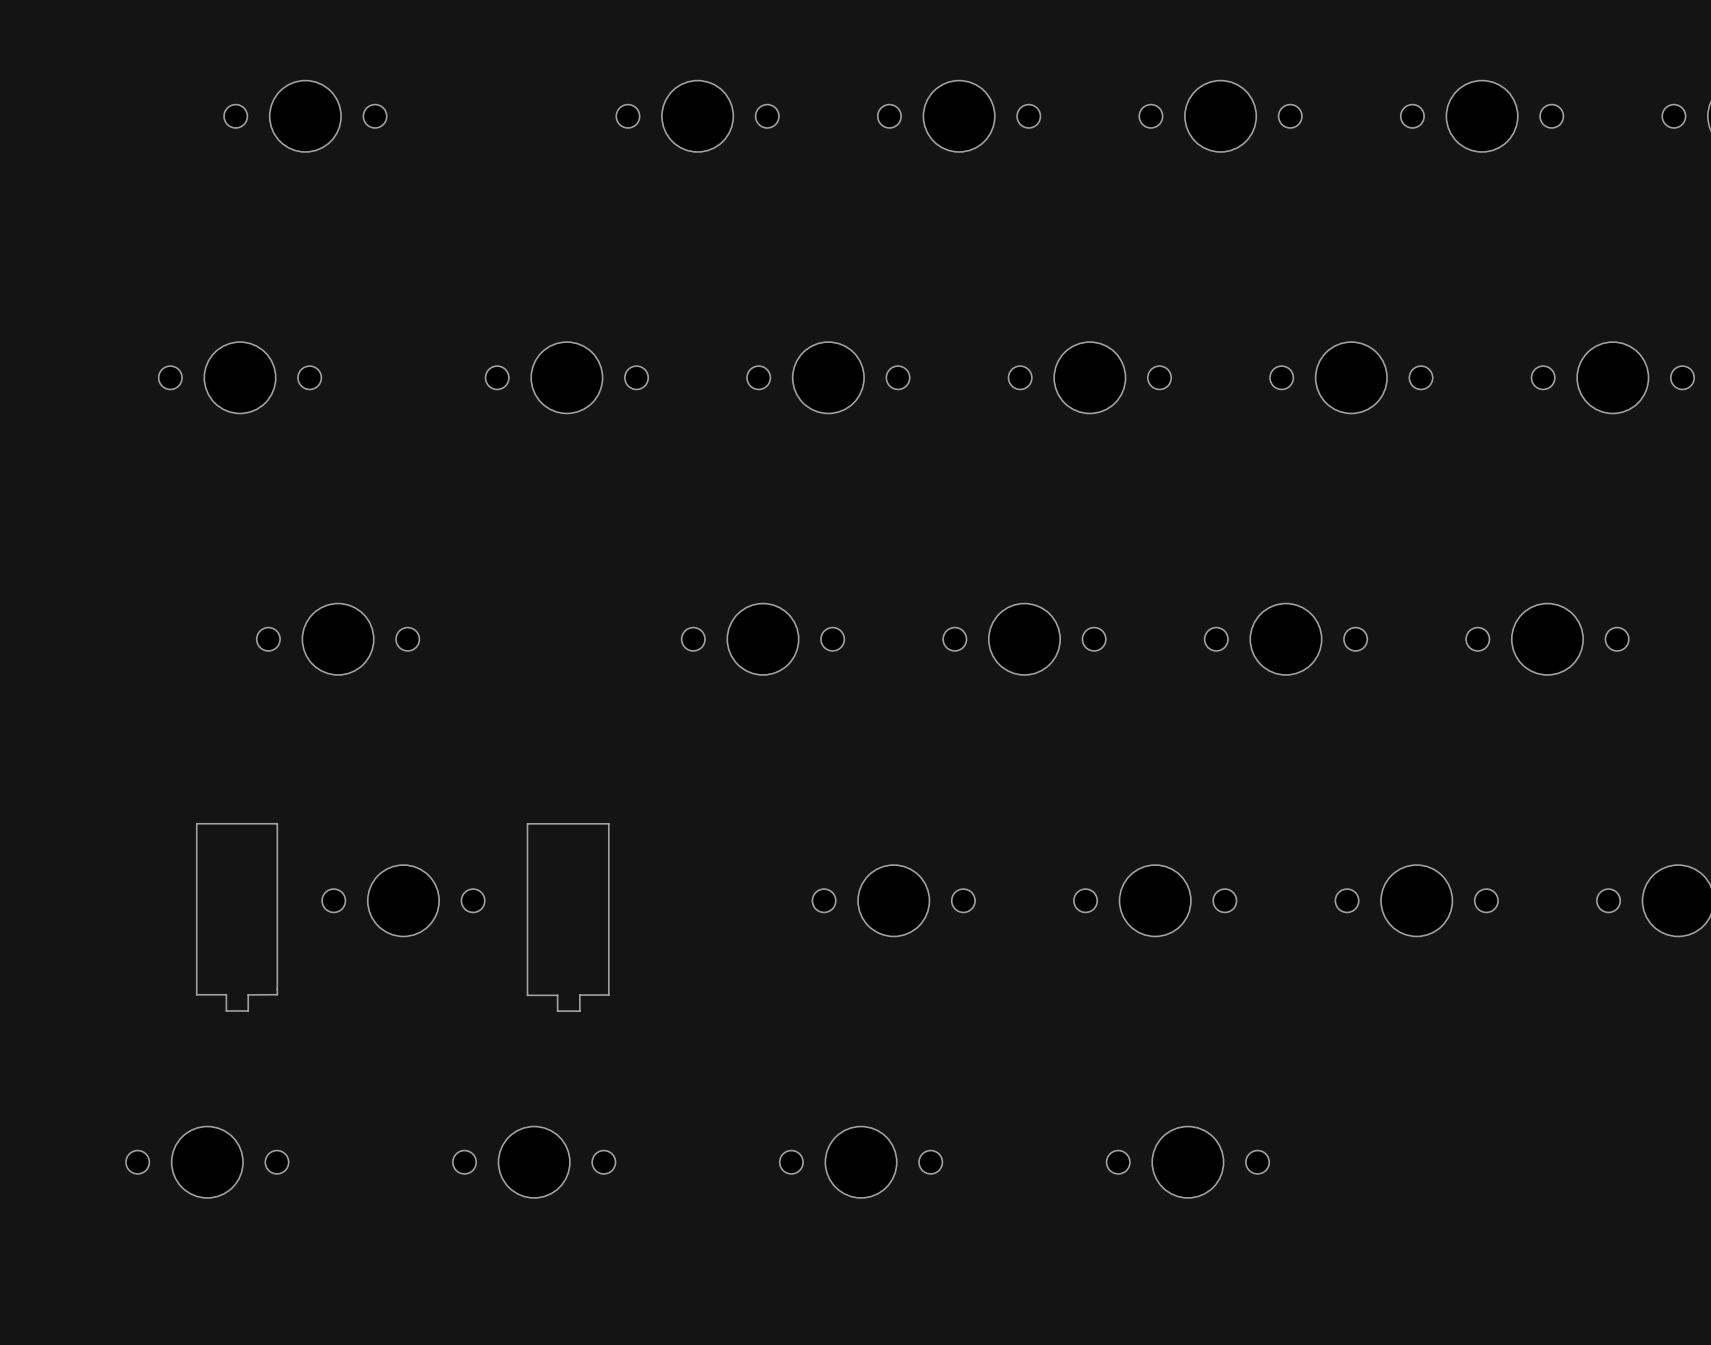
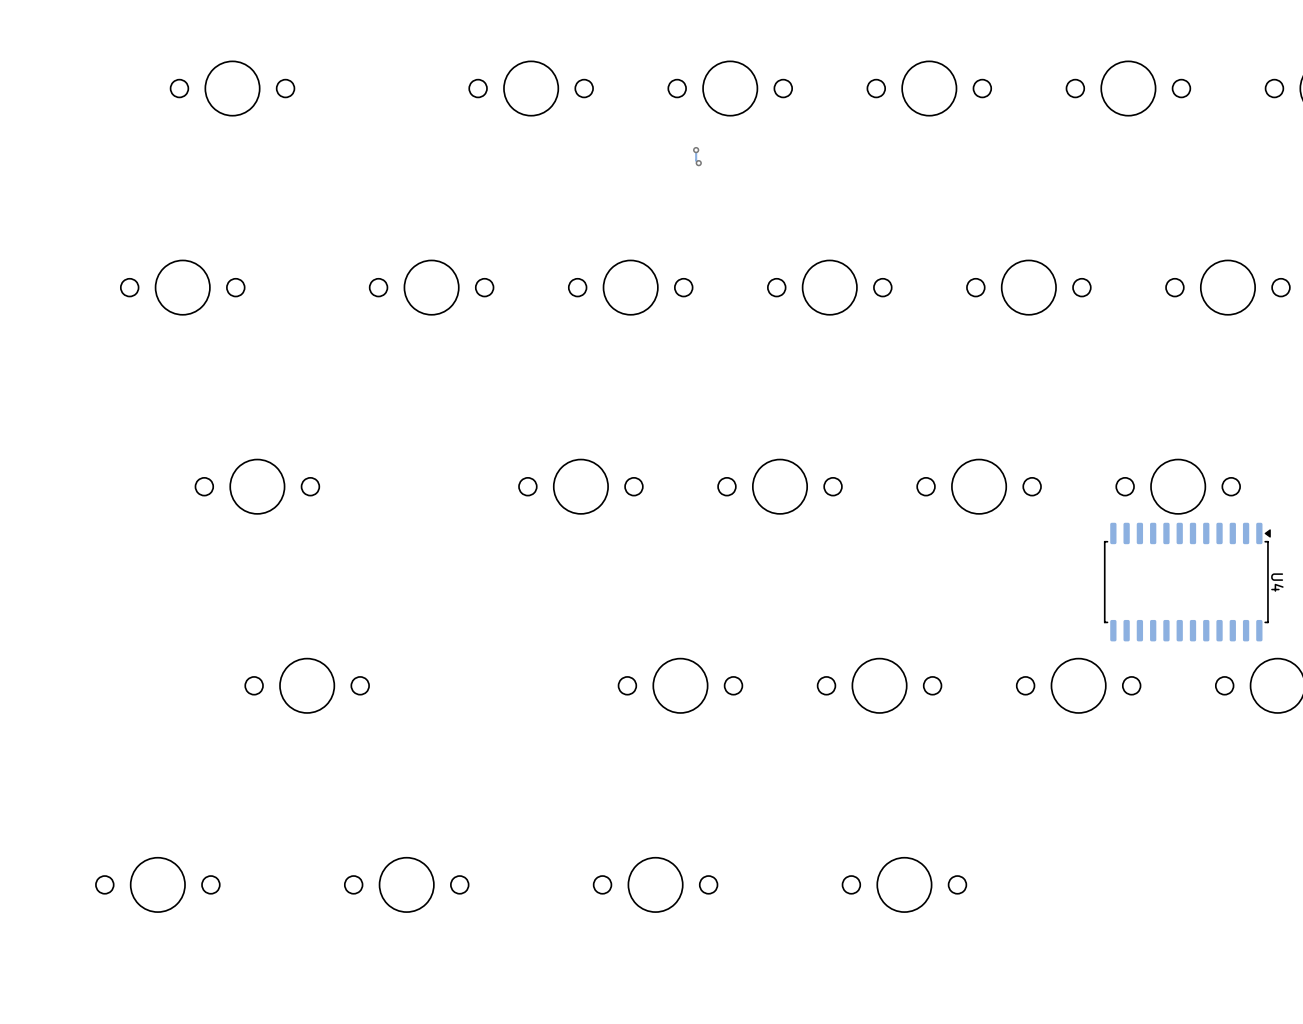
track: none -> (696, 150) (696, 160) (698, 163)
via: none -> (696, 150)
via: none -> (698, 163)
U4: none -> (1187, 582)
drawing: [196, 823, 610, 1012] -> none

